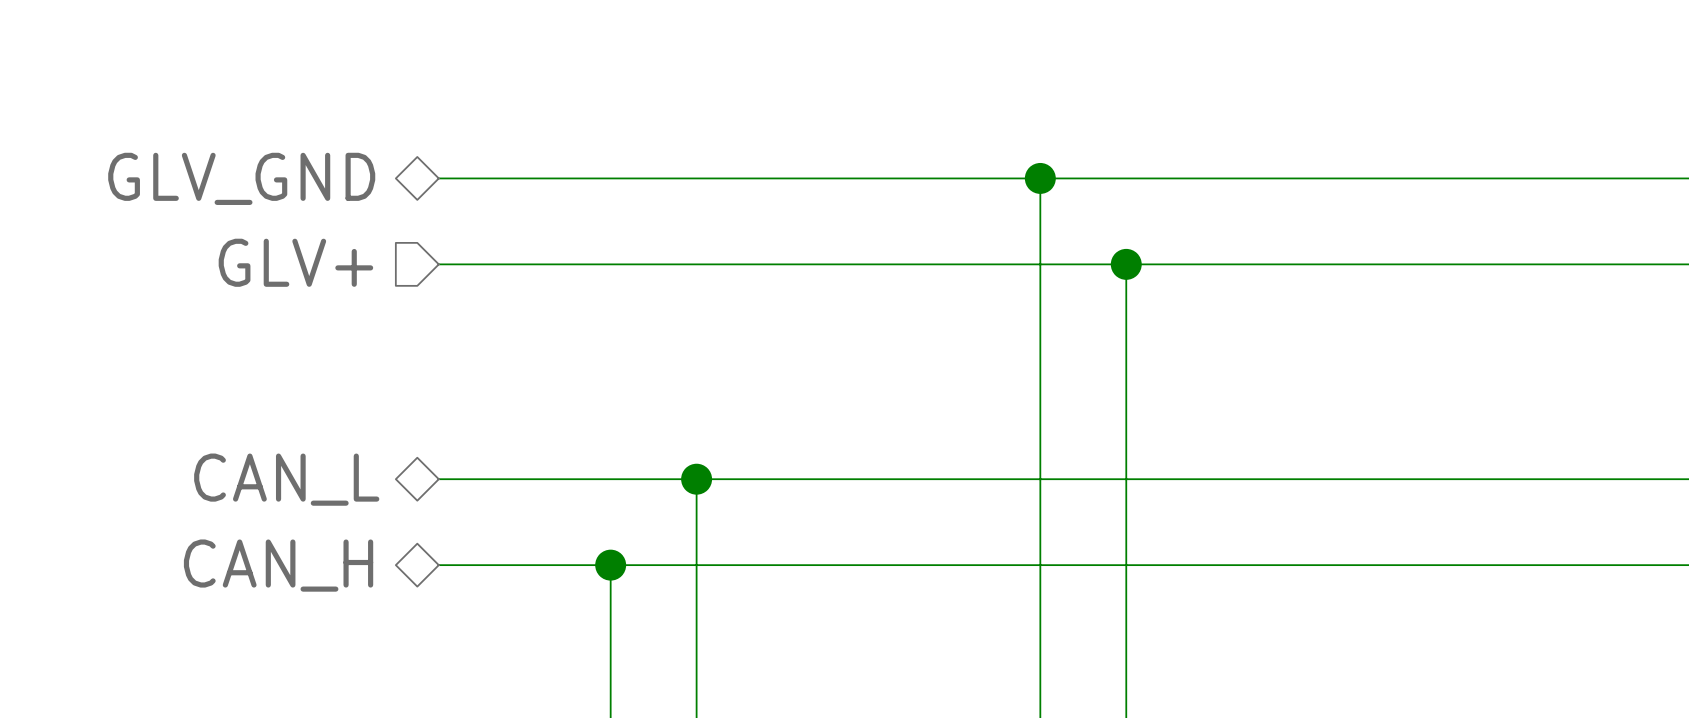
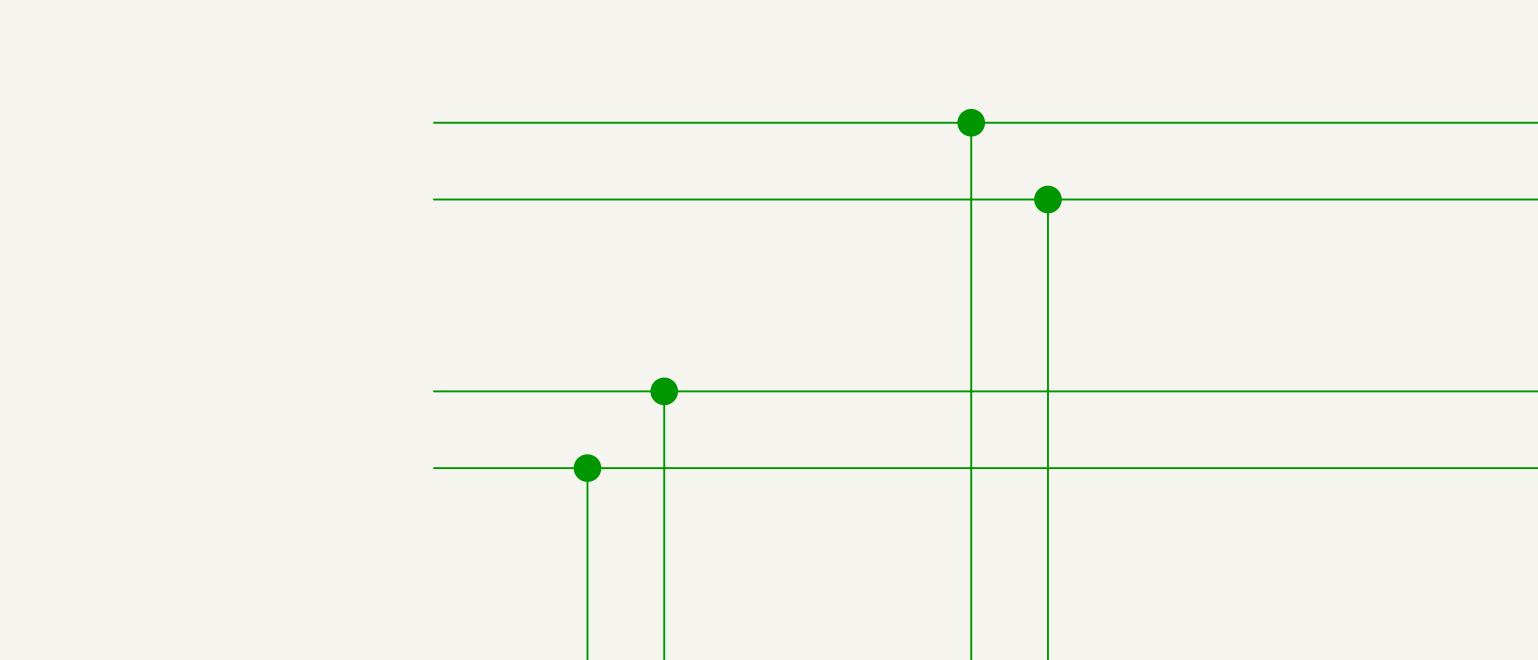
hierarchical label: GLV_GND (241, 178) -> none
hierarchical label: GLV+ (295, 262) -> none
hierarchical label: CAN_L (286, 479) -> none
hierarchical label: CAN_H (278, 565) -> none

